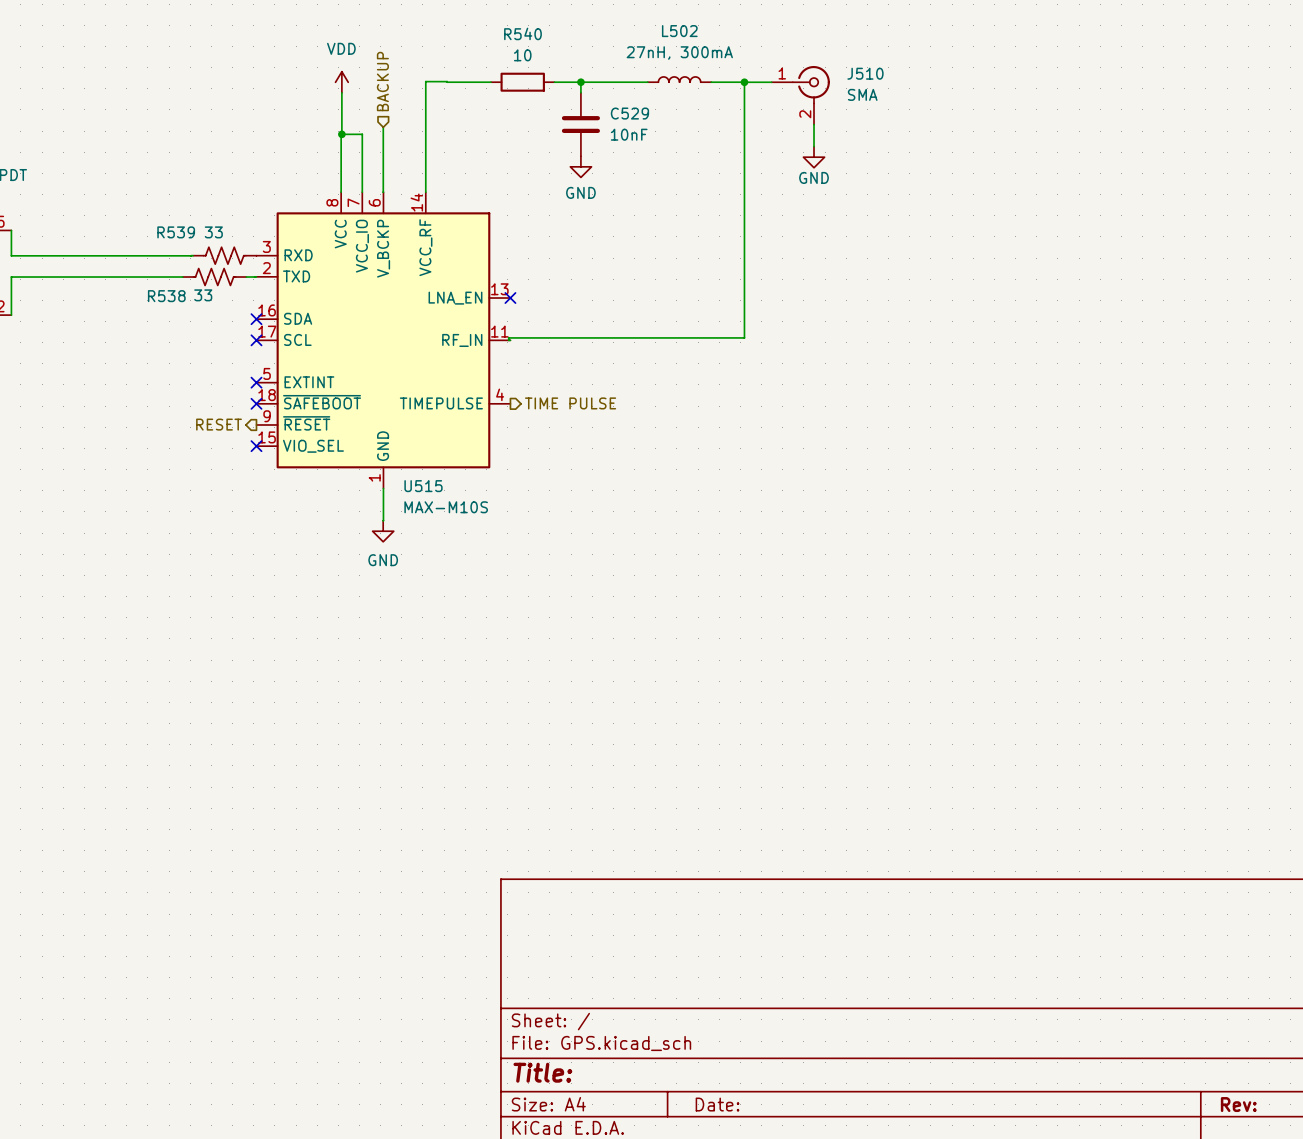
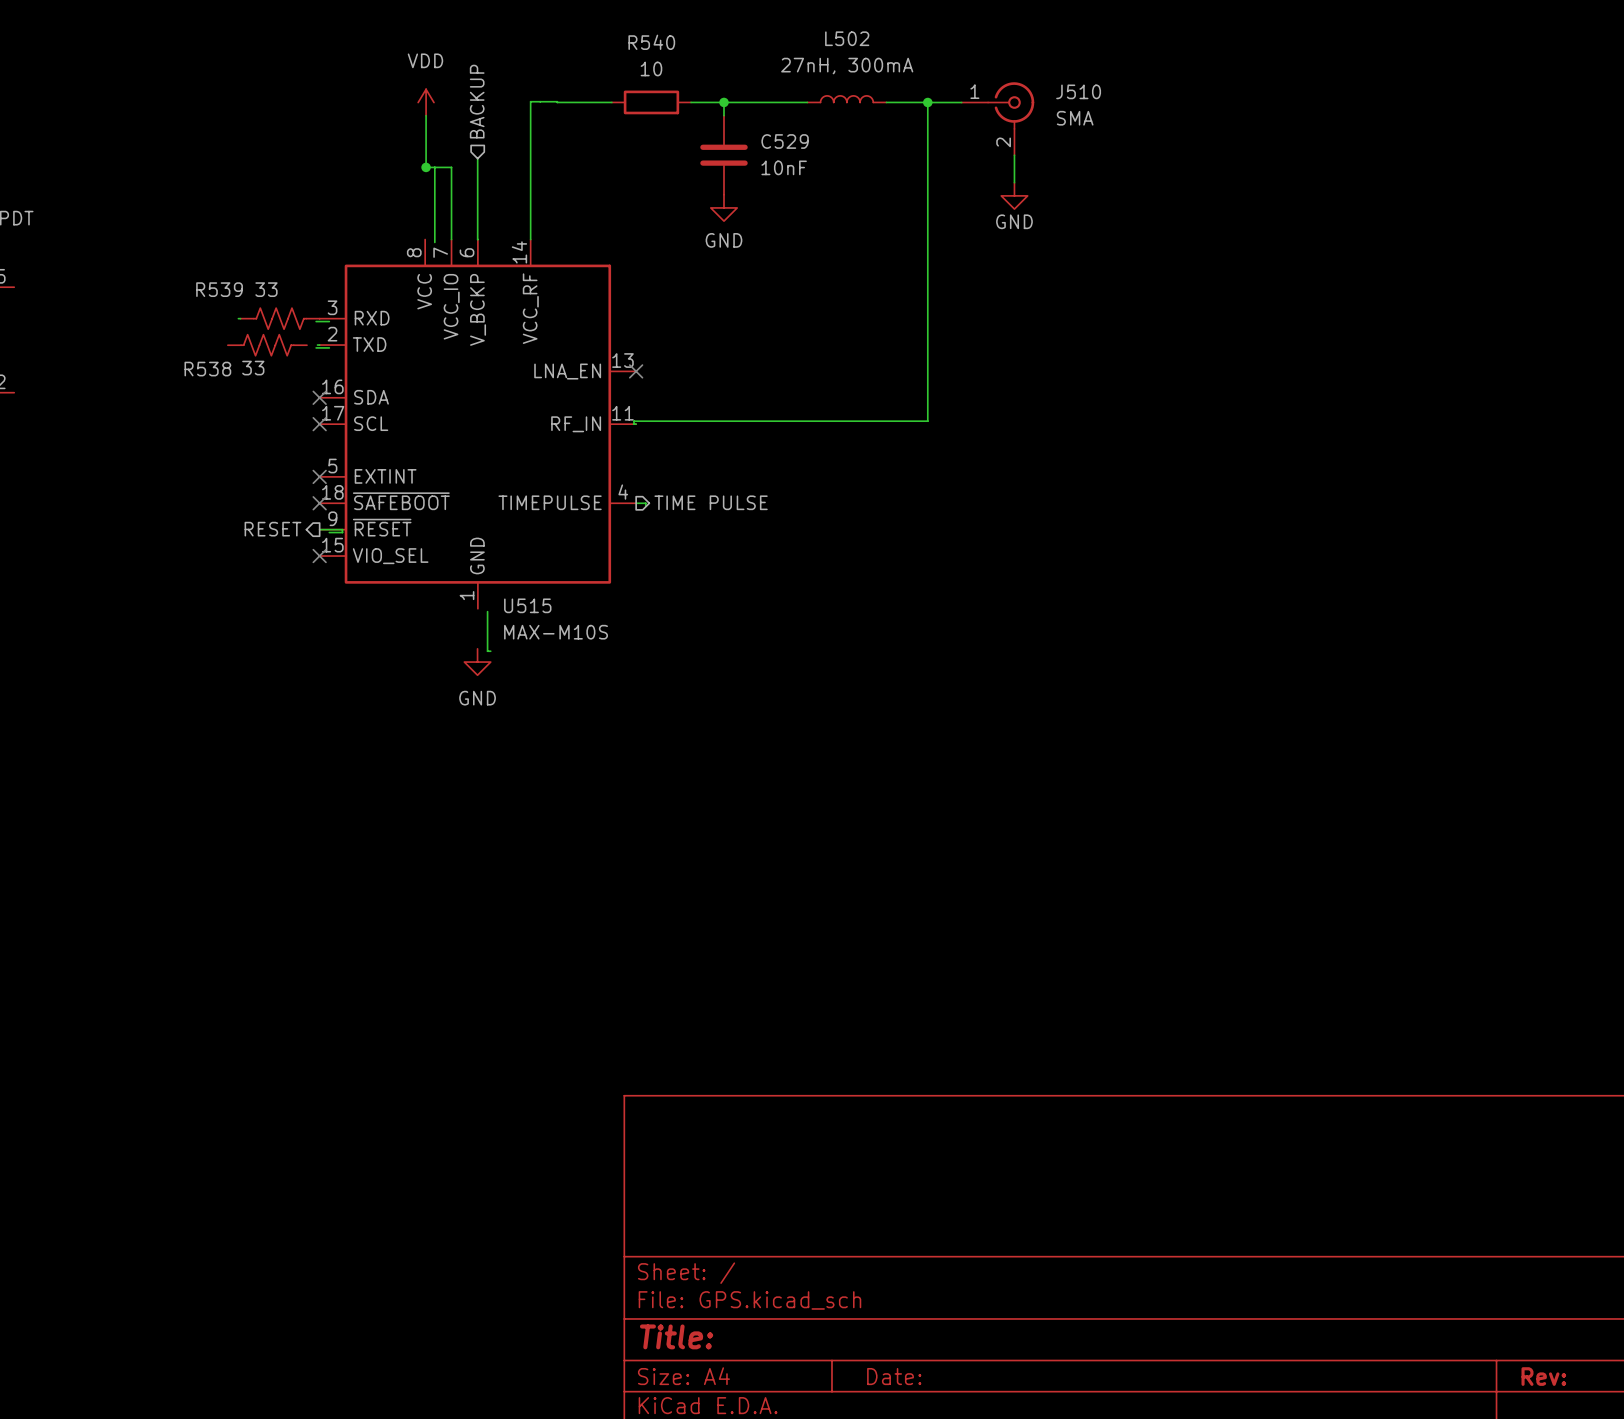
wire: (341, 134) (341, 192) -> none
wire: none -> (434, 167) (434, 242)
wire: (11, 230) (11, 255) (191, 255) -> none
wire: none -> (316, 321) (329, 321)
wire: (182, 277) (11, 277) (11, 315) -> none
wire: (246, 277) (254, 277) -> none
wire: none -> (316, 347) (329, 347)
wire: none -> (636, 503) (645, 503) (645, 506)
wire: none -> (319, 529) (342, 529) (342, 532) (329, 532)
wire: (383, 488) (383, 520) -> none
wire: none -> (487, 611) (487, 651) (490, 651)

